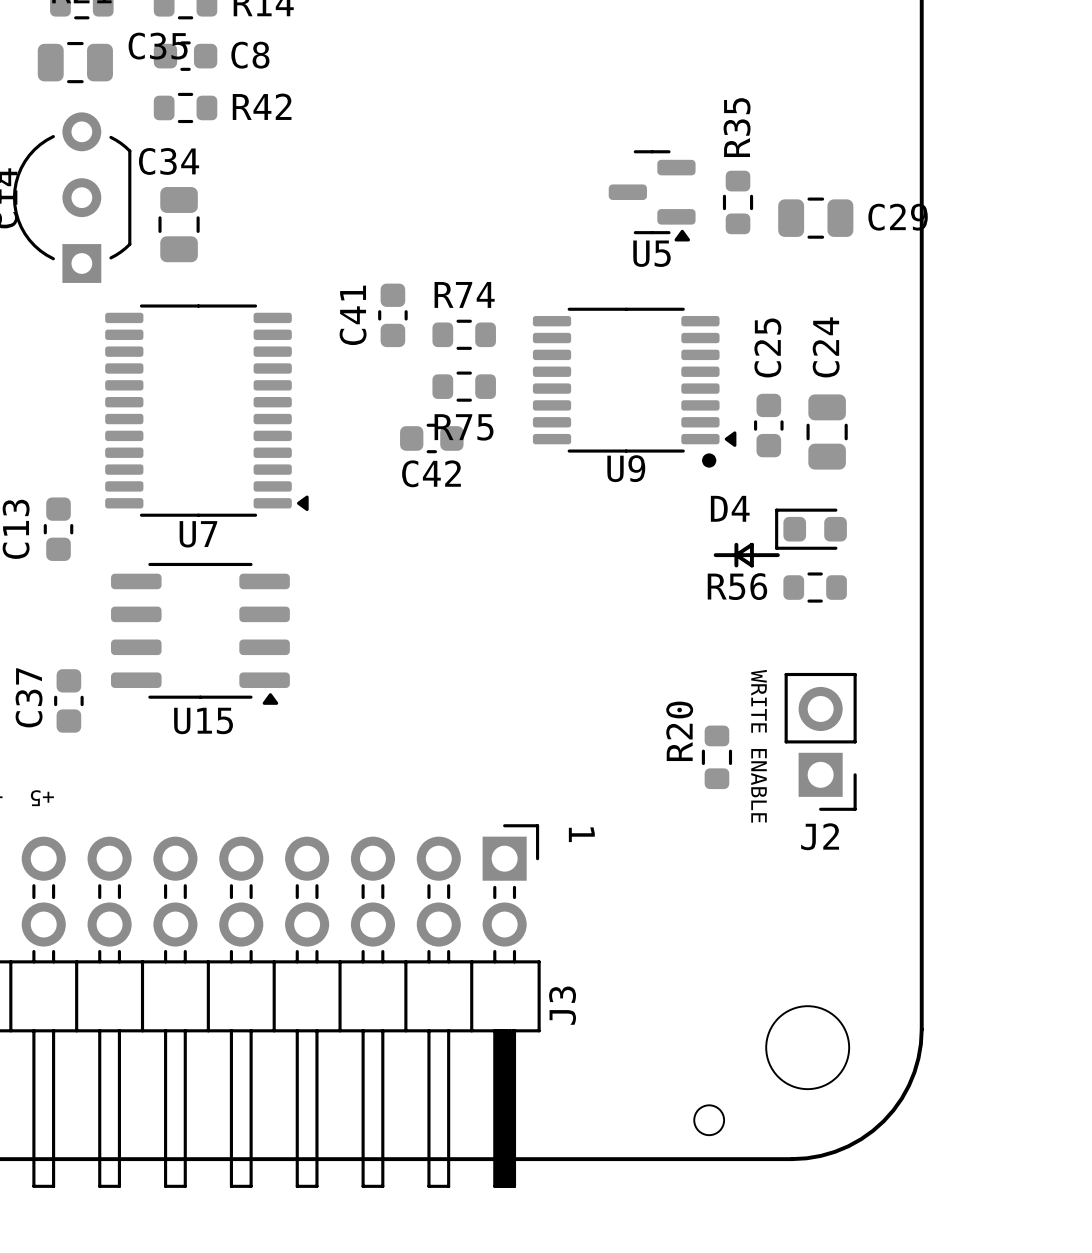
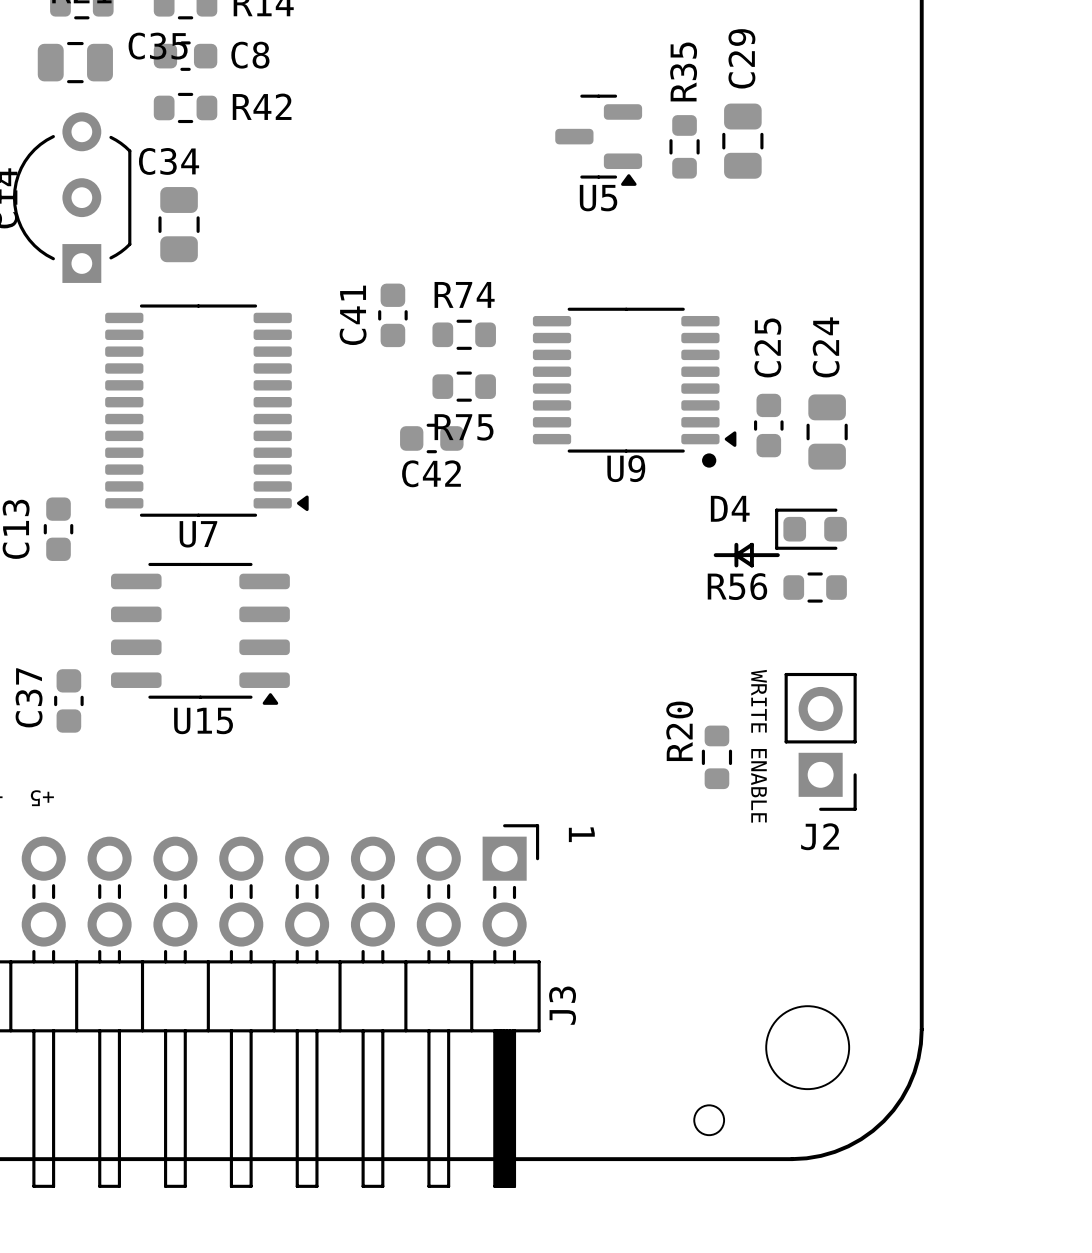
U5 position: (652, 195) -> (598, 140)
R35 position: (738, 202) -> (684, 146)
C29 name position: C29 (898, 217) -> C29 (741, 58)
C29 rotation: 0° (815, 218) -> 90° clockwise (742, 141)
C29 position: (815, 218) -> (742, 141)

